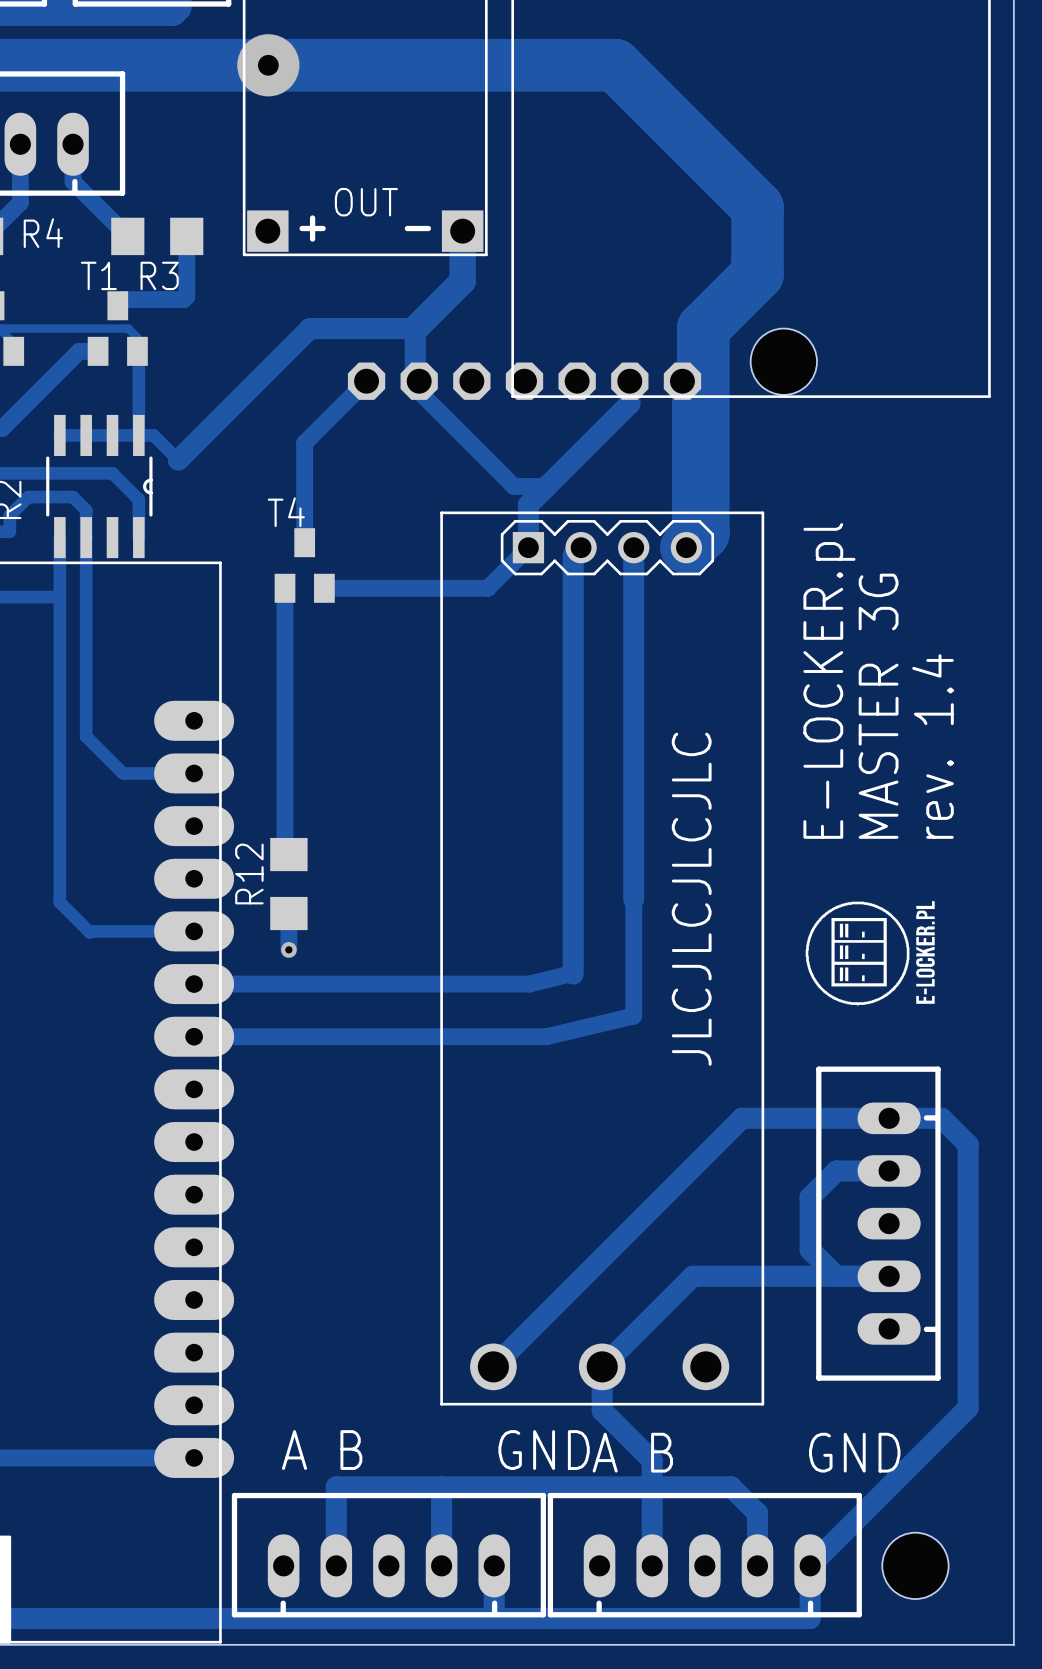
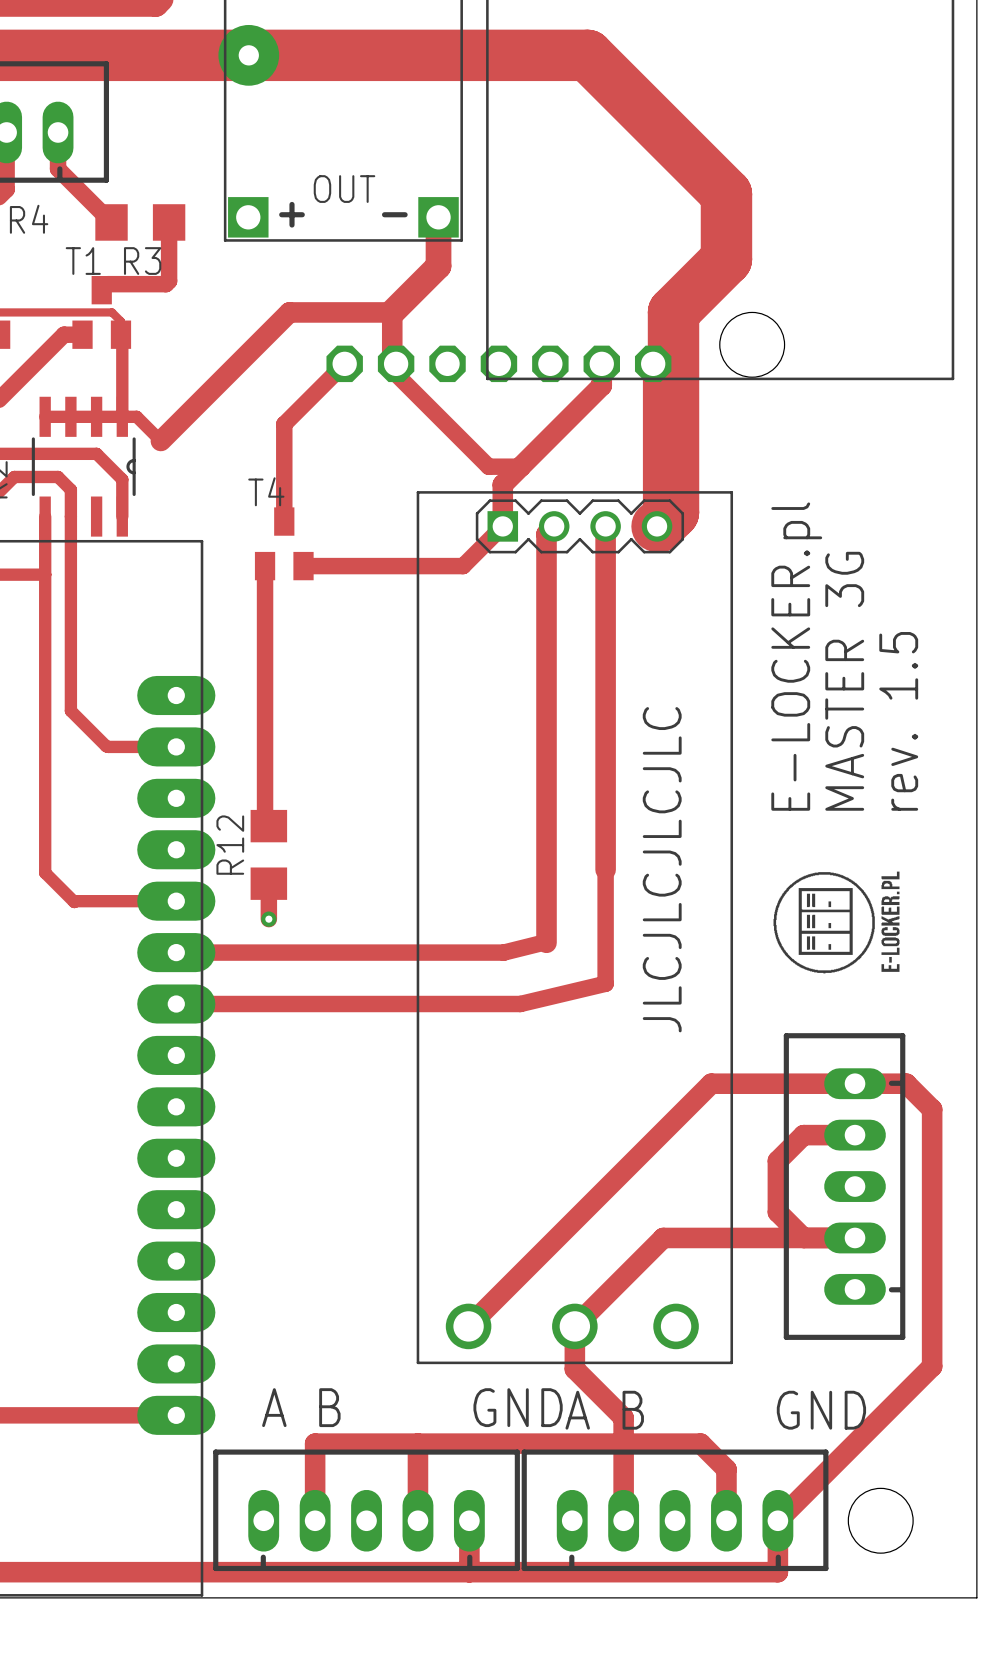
text: rev. 1.4 (933, 746) -> rev. 1.5 (898, 721)

